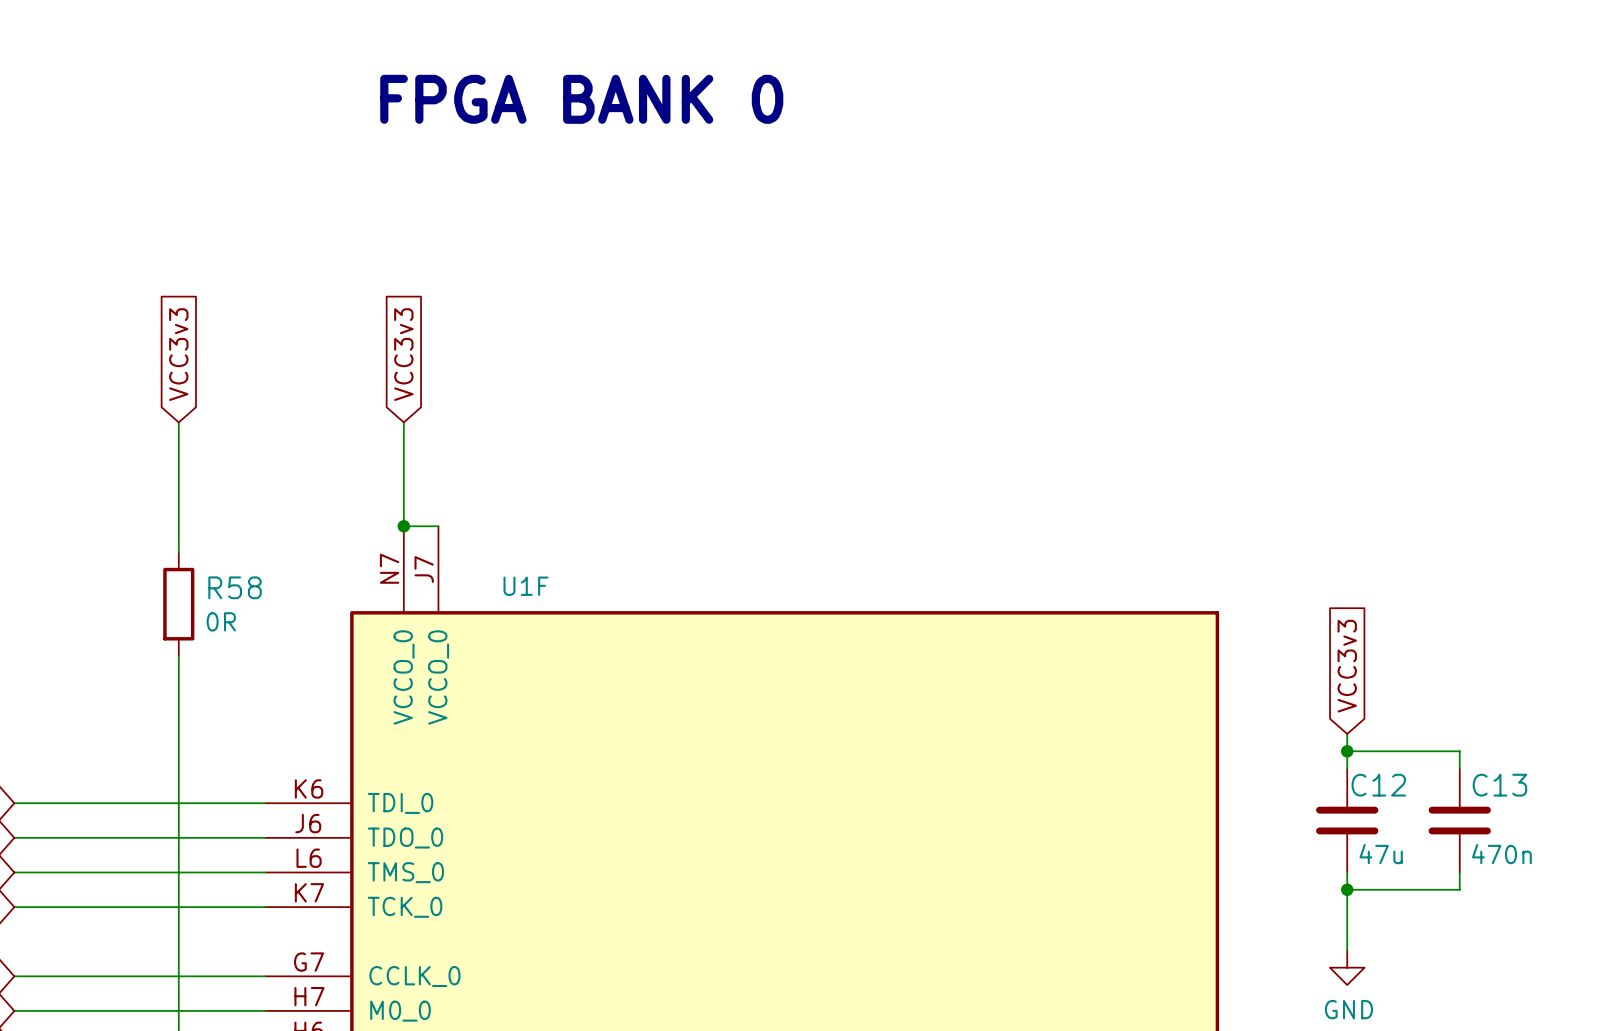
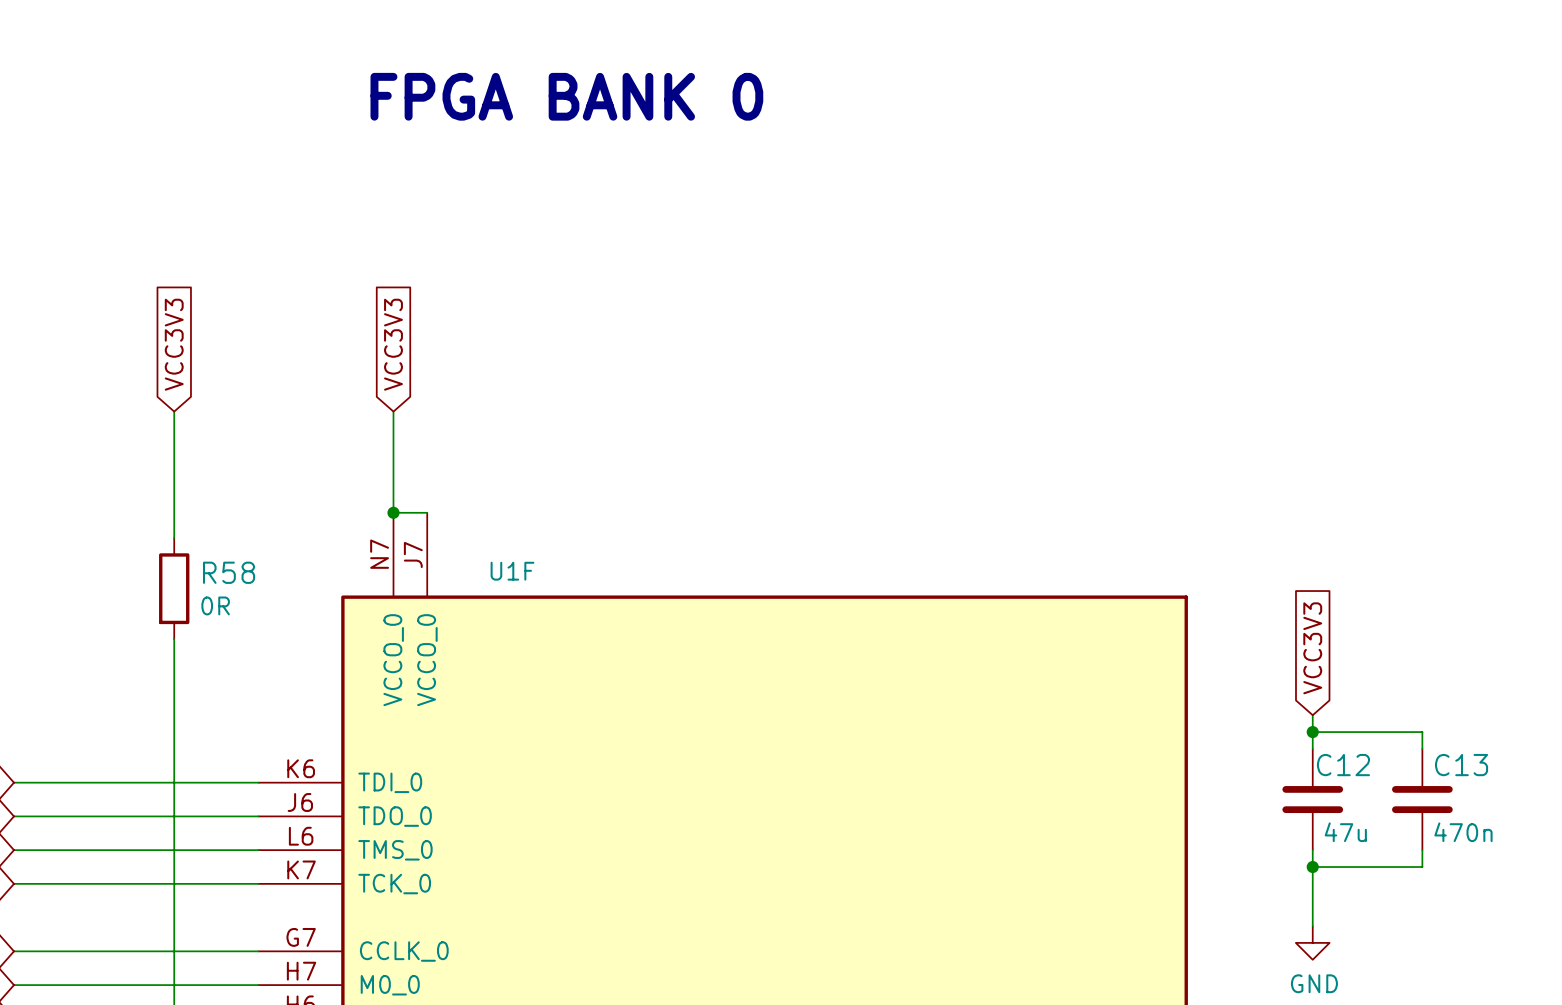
global label: VCC3v3 (178, 354) -> VCC3V3 (174, 344)
global label: VCC3v3 (403, 354) -> VCC3V3 (393, 344)
global label: VCC3v3 (1347, 666) -> VCC3V3 (1312, 648)

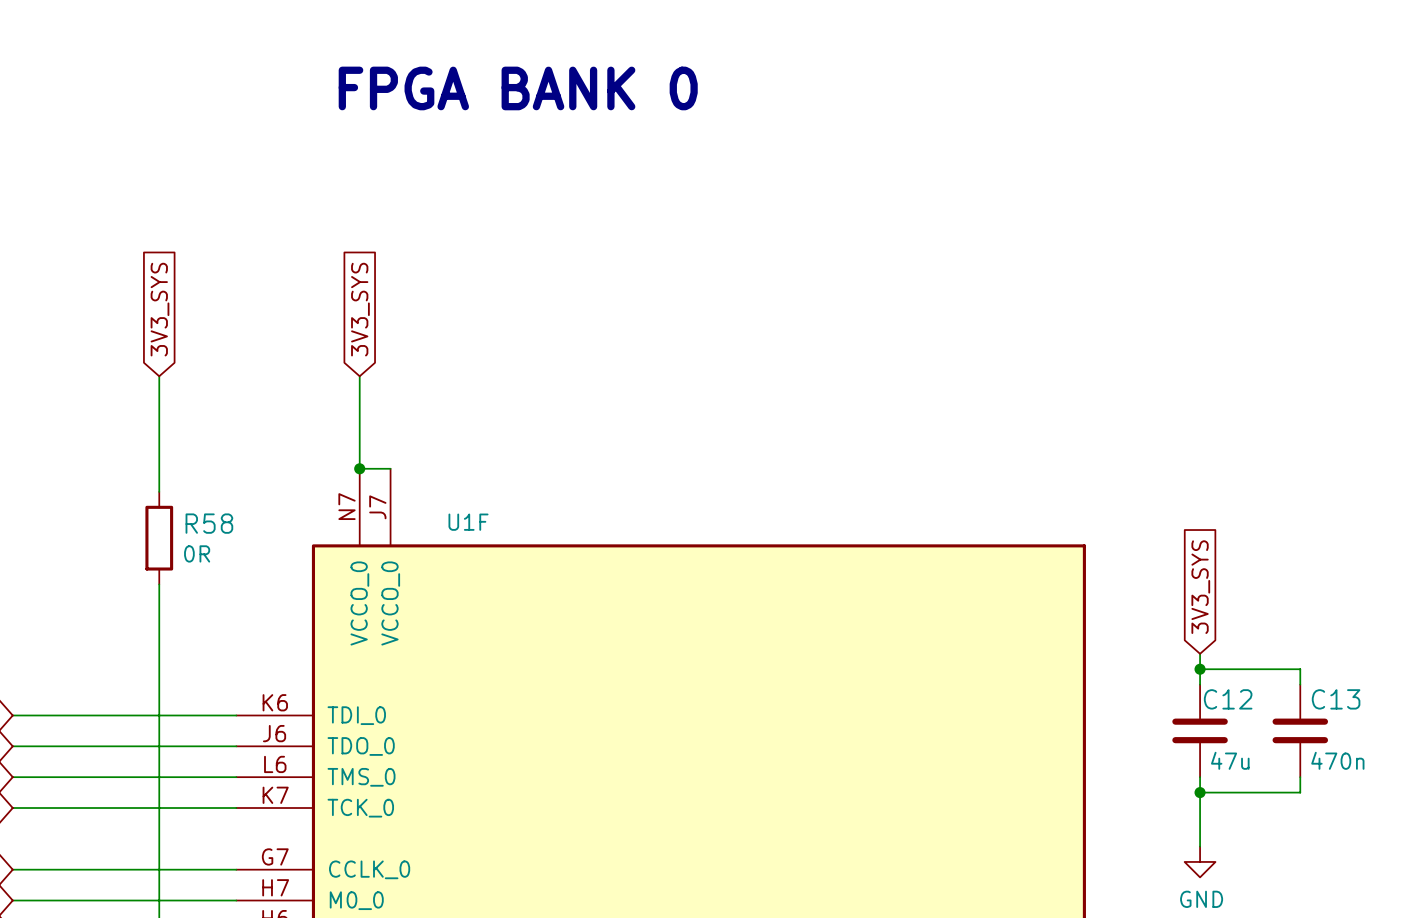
global label: VCC3V3 (174, 344) -> 3V3_SYS (160, 309)
global label: VCC3V3 (393, 344) -> 3V3_SYS (360, 309)
global label: VCC3V3 (1312, 648) -> 3V3_SYS (1200, 587)

